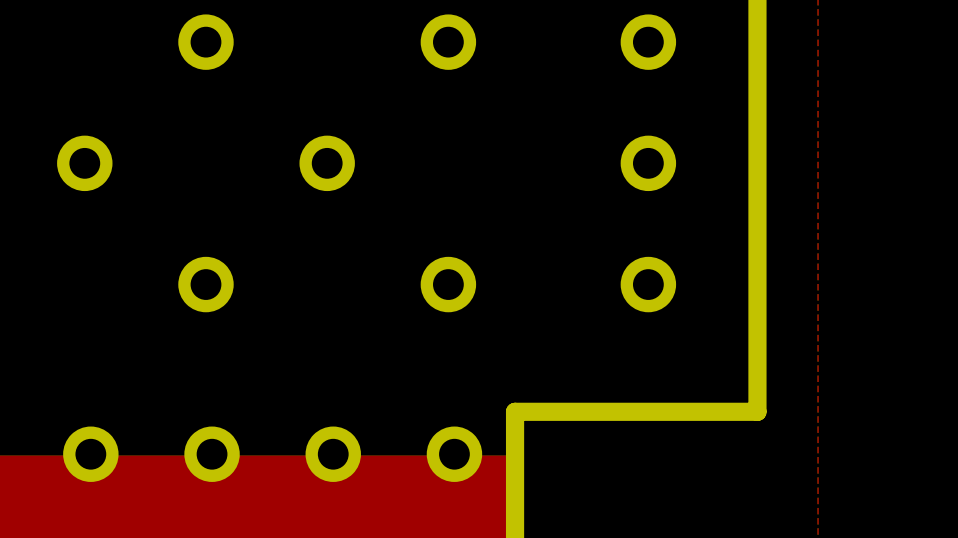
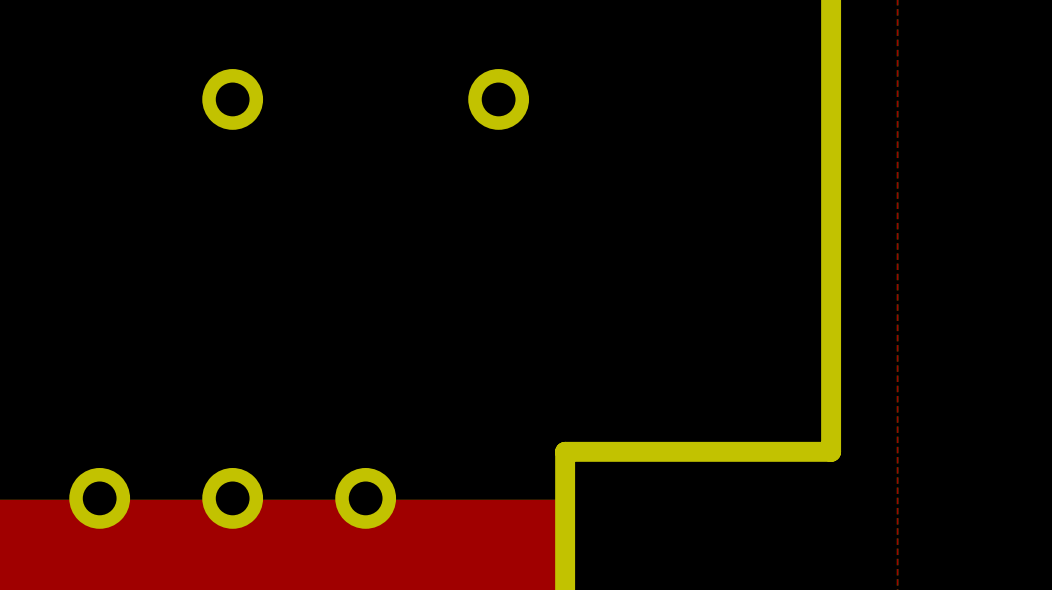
part position: (205, 42) -> (232, 99)
part position: (448, 42) -> (498, 99)
part: (648, 42) -> none
part: (84, 163) -> none
part: (327, 163) -> none
part: (648, 163) -> none
part: (205, 284) -> none
part: (448, 284) -> none
part: (648, 284) -> none
part: (454, 454) -> none

